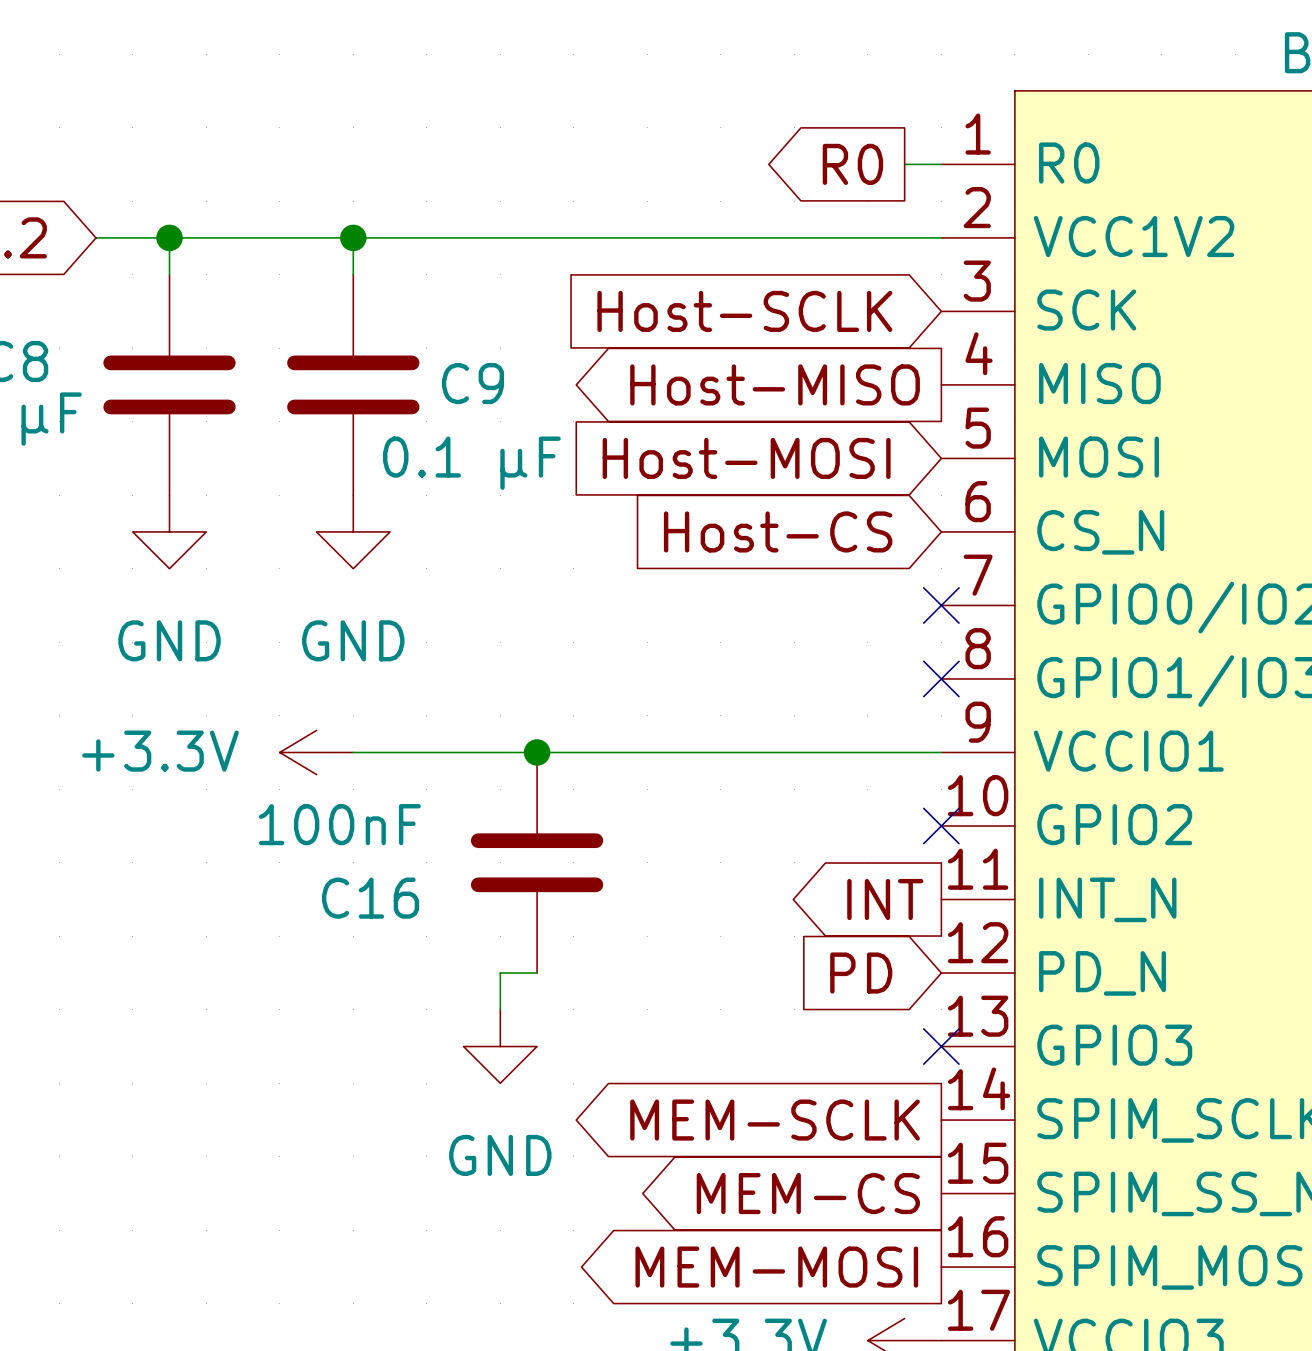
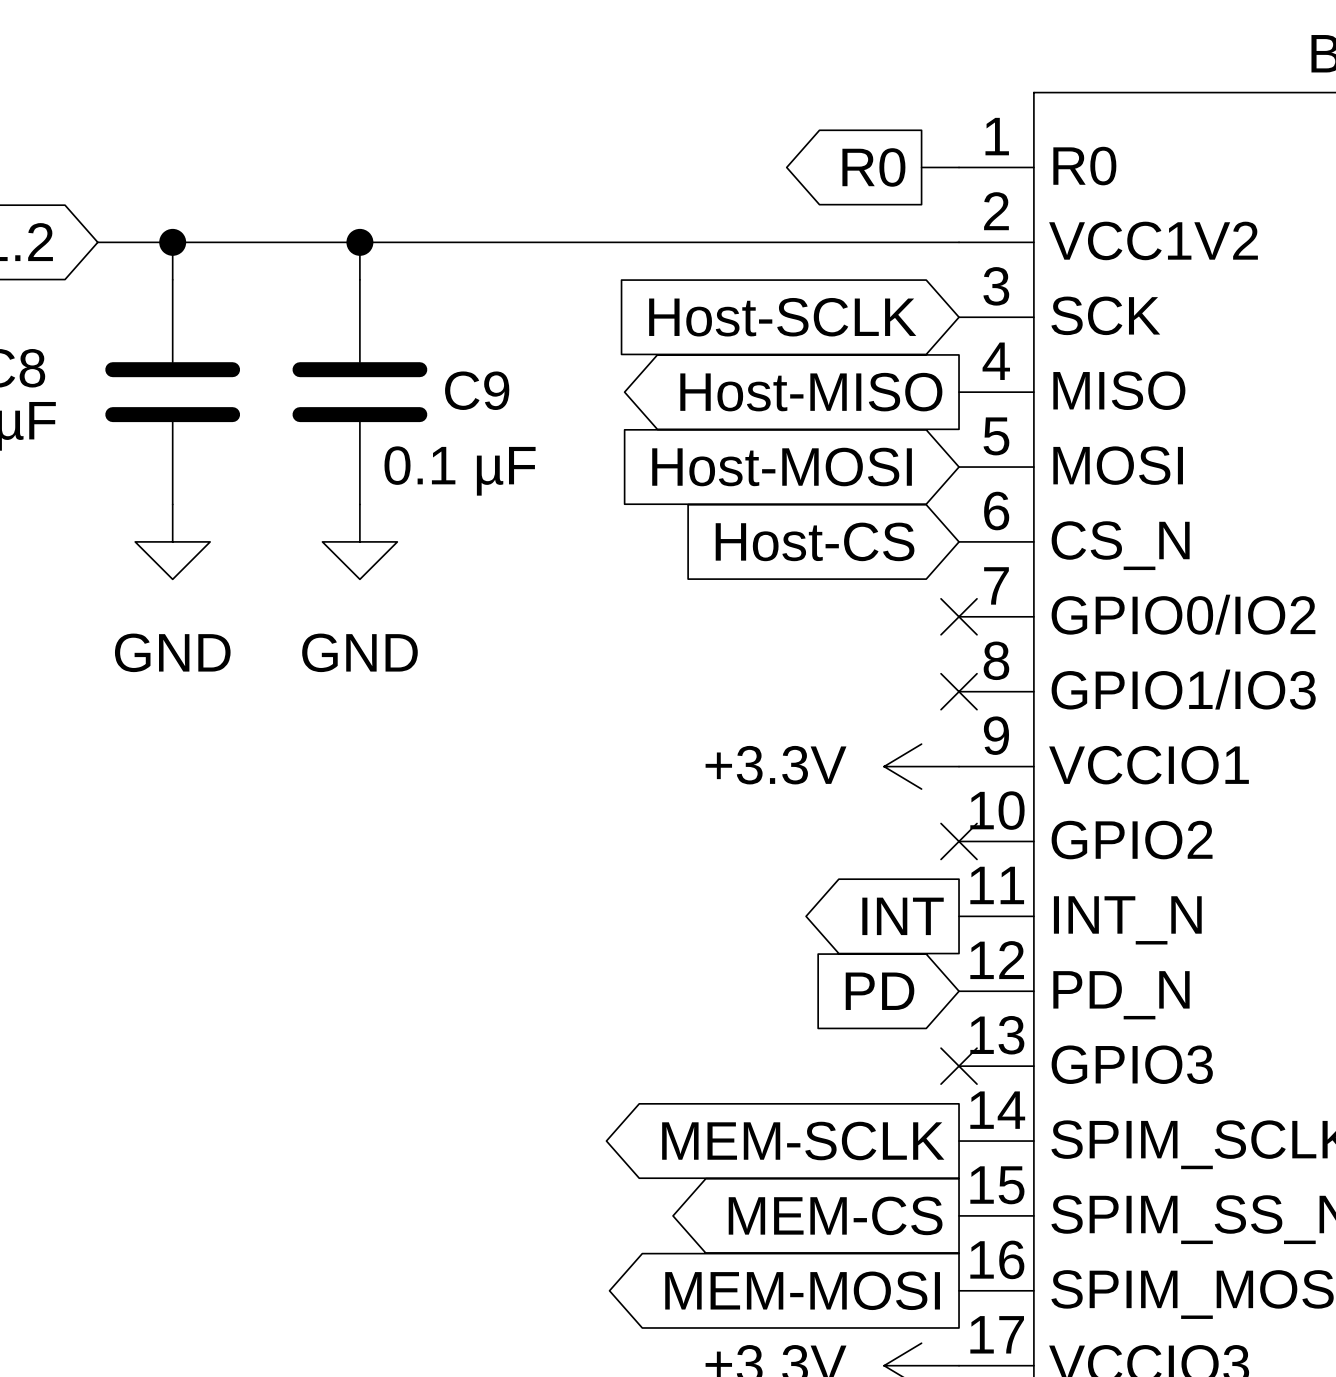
power symbol position: +3.3V (316, 752) -> +3.3V (921, 766)
wire: (353, 752) (941, 752) -> none
junction: (537, 752) -> none
C16: 100nF (537, 862) -> none
wire: (537, 973) (500, 973) (500, 1009) -> none
power symbol: GND (500, 1046) -> none

